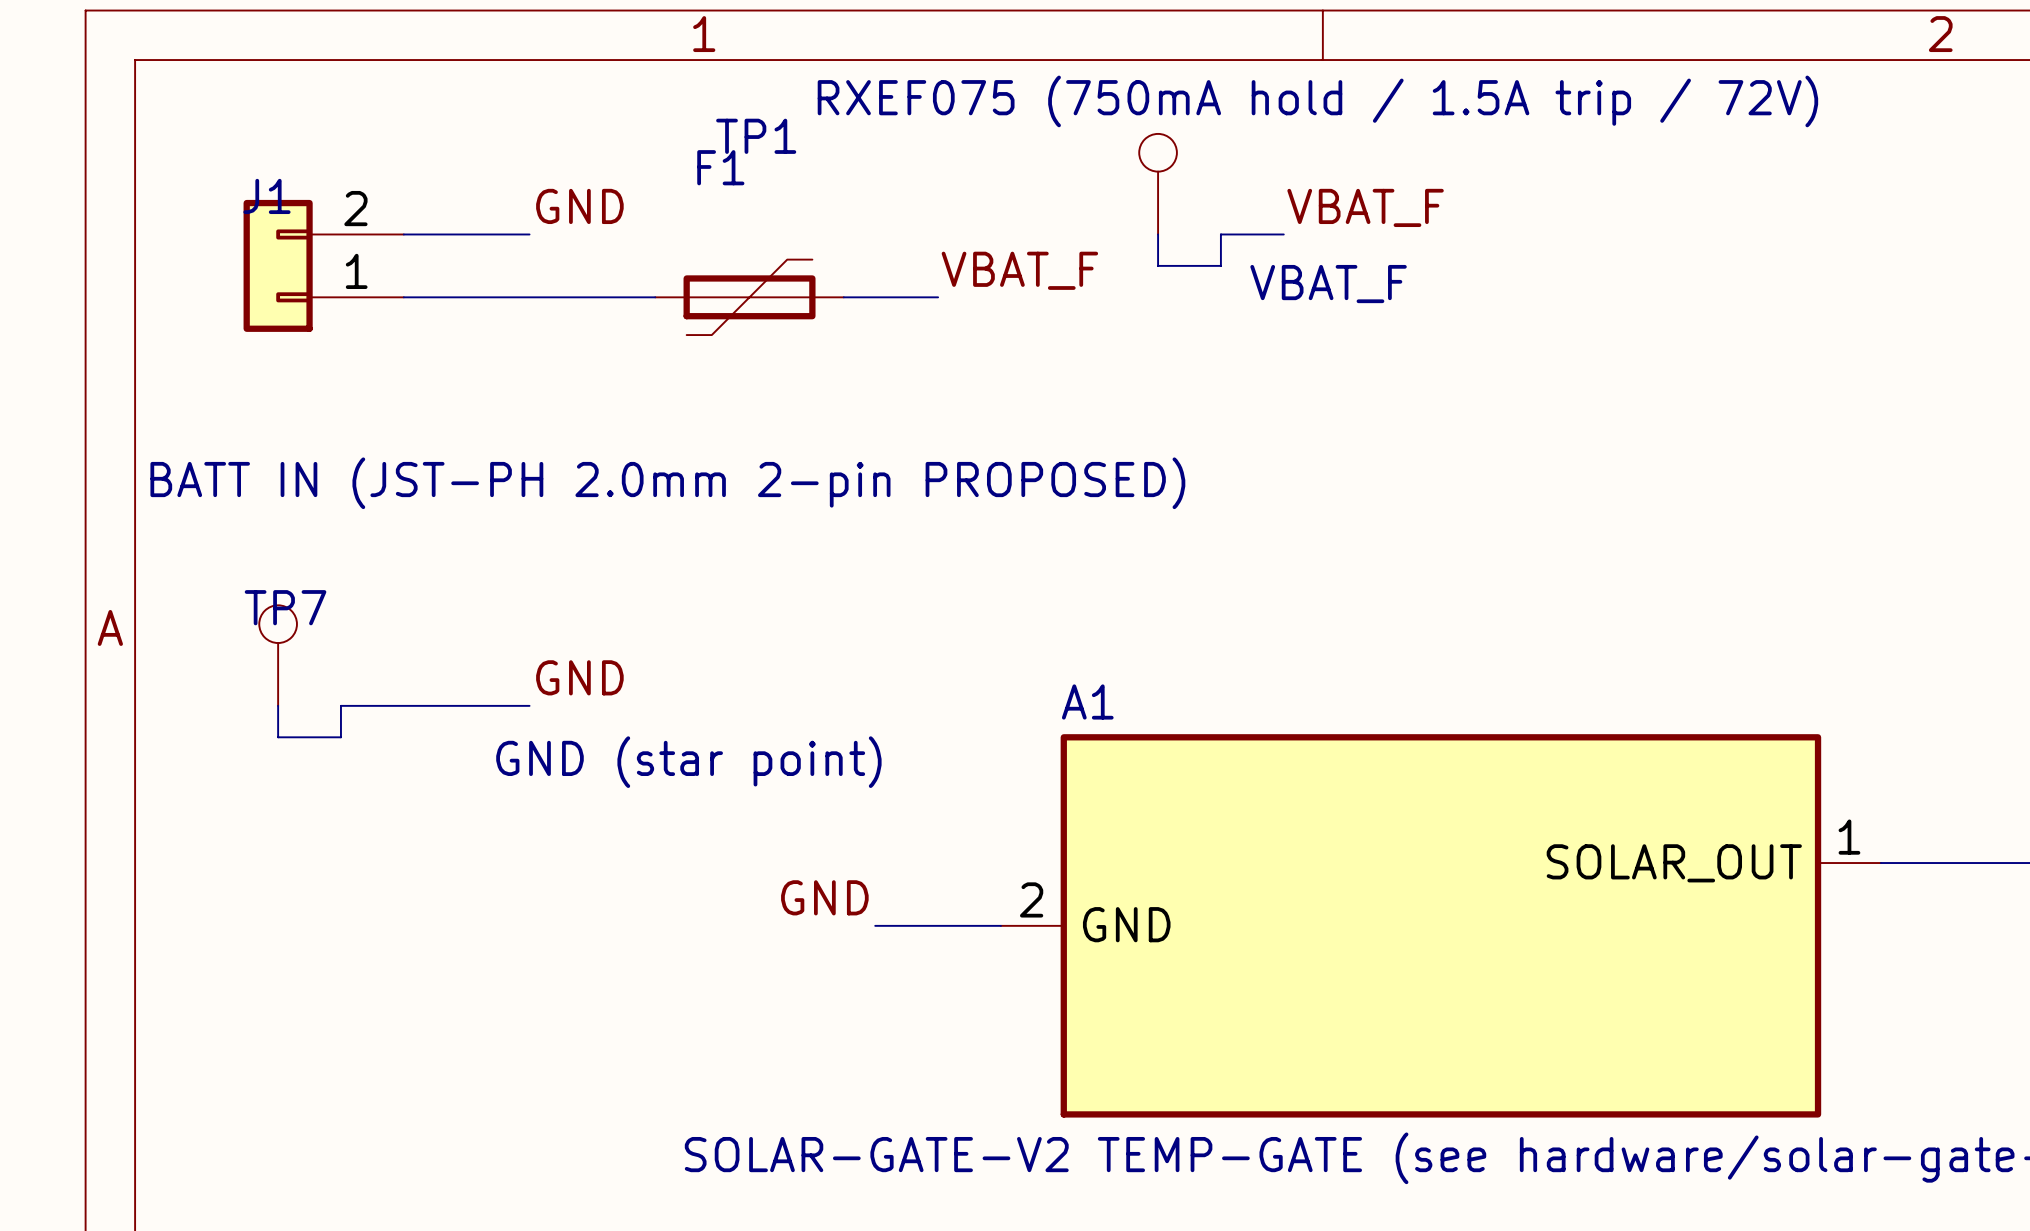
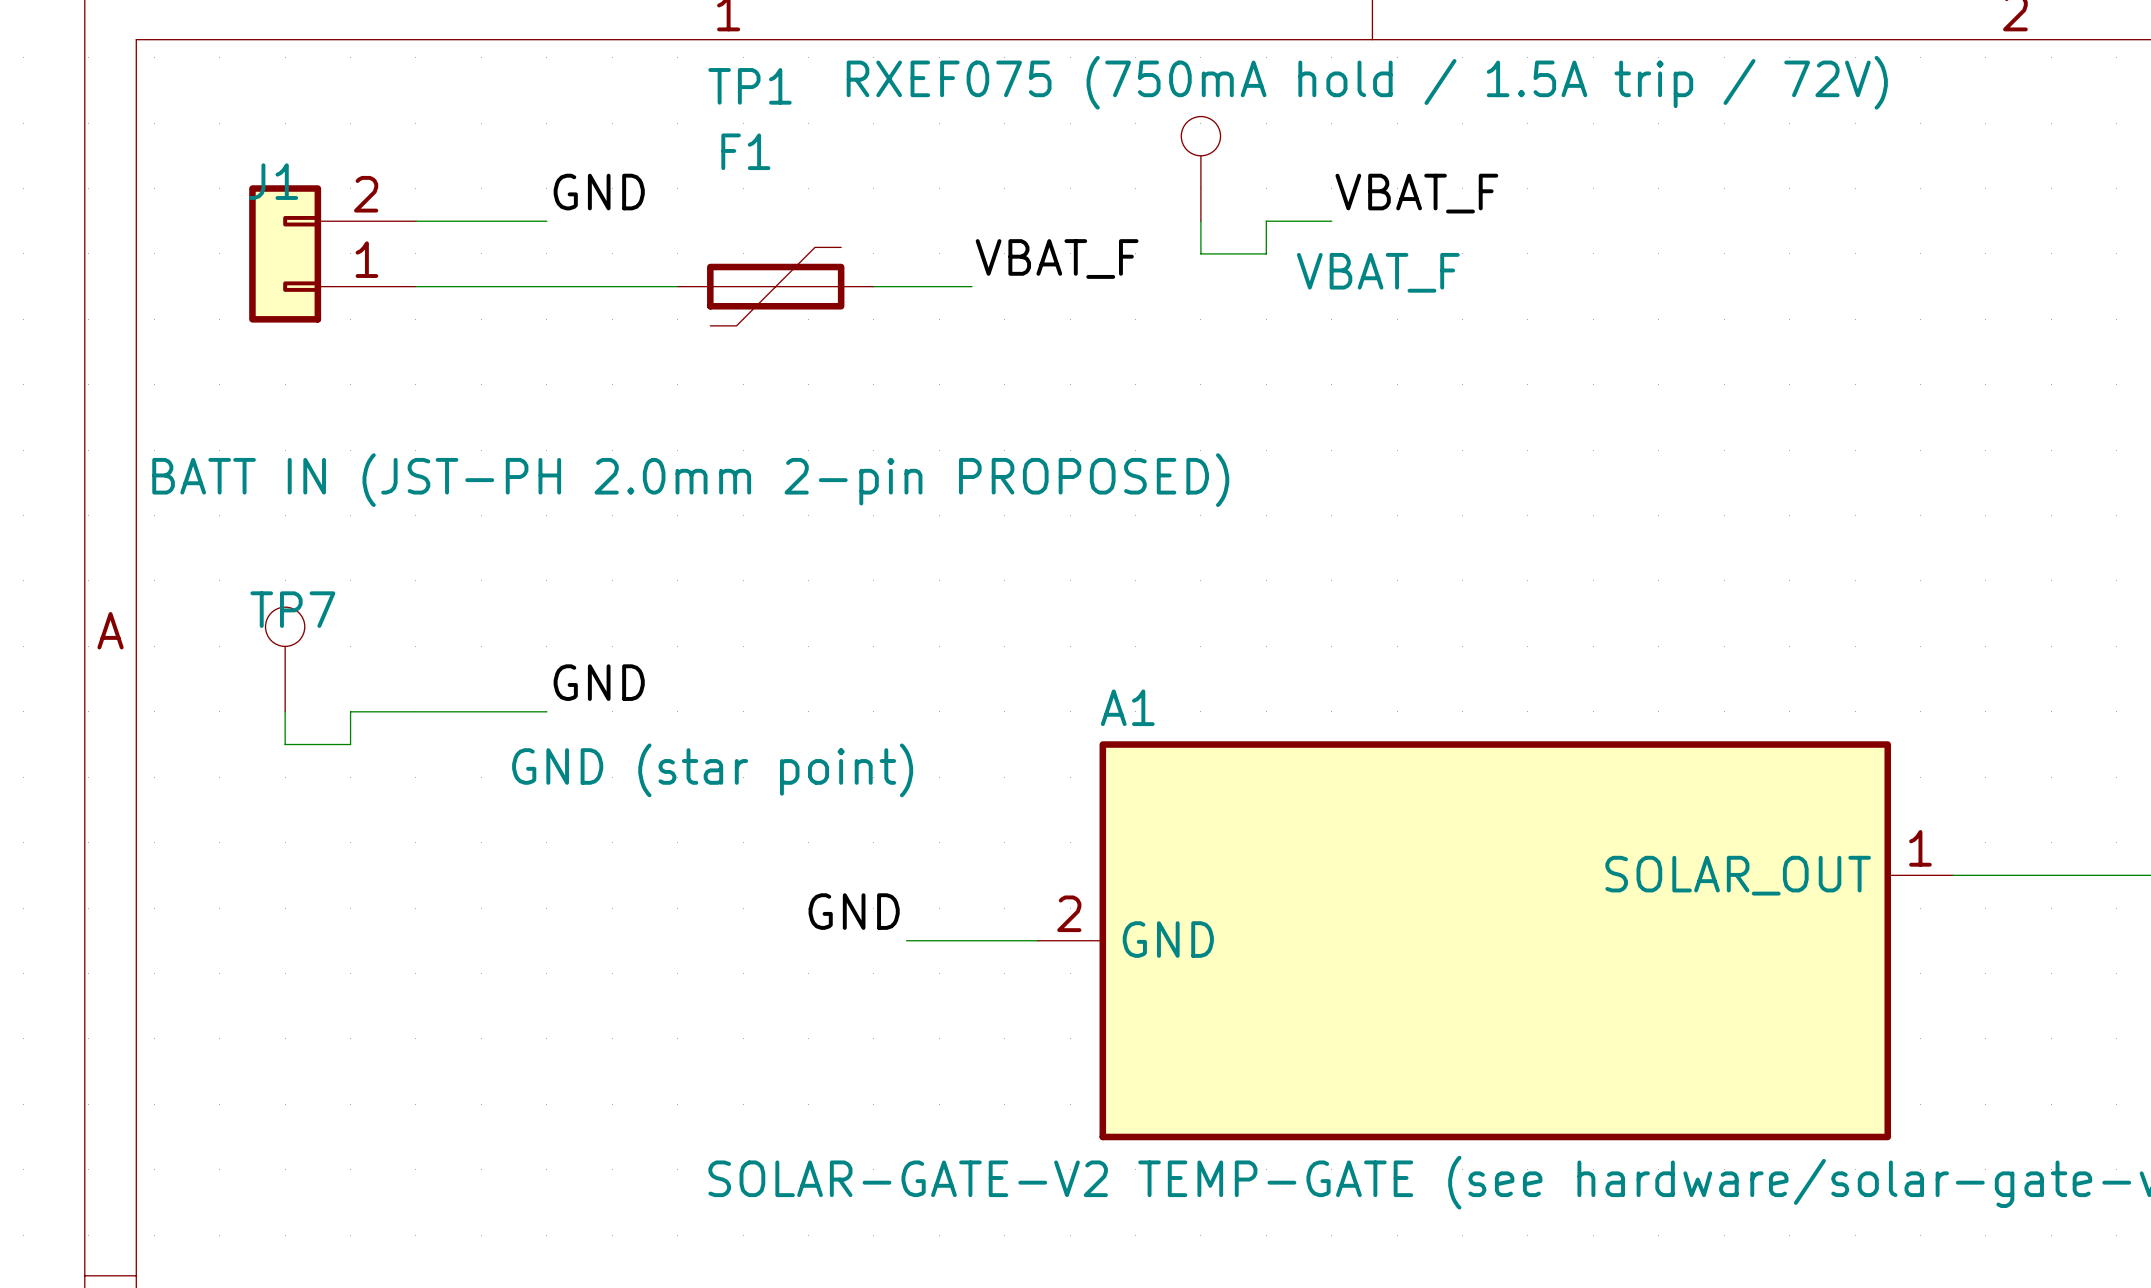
TP1 name position: TP1 (756, 136) -> TP1 (749, 86)

